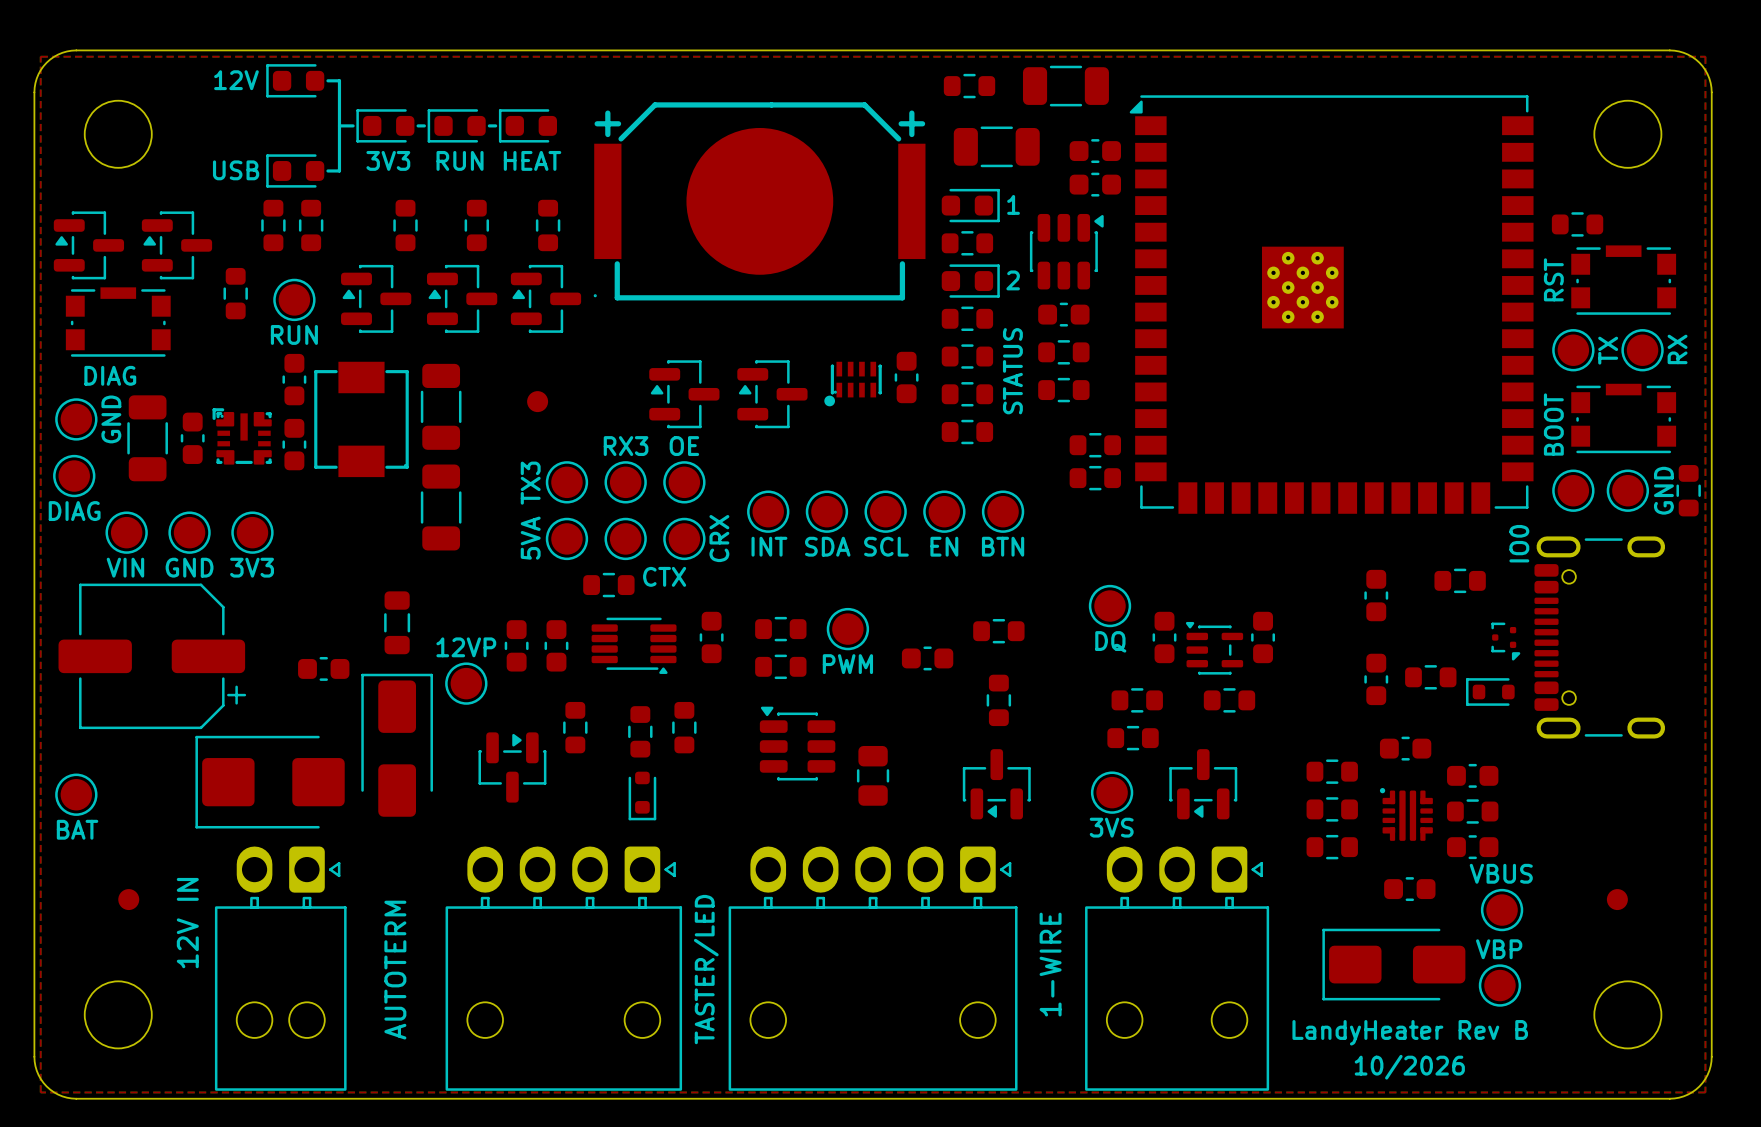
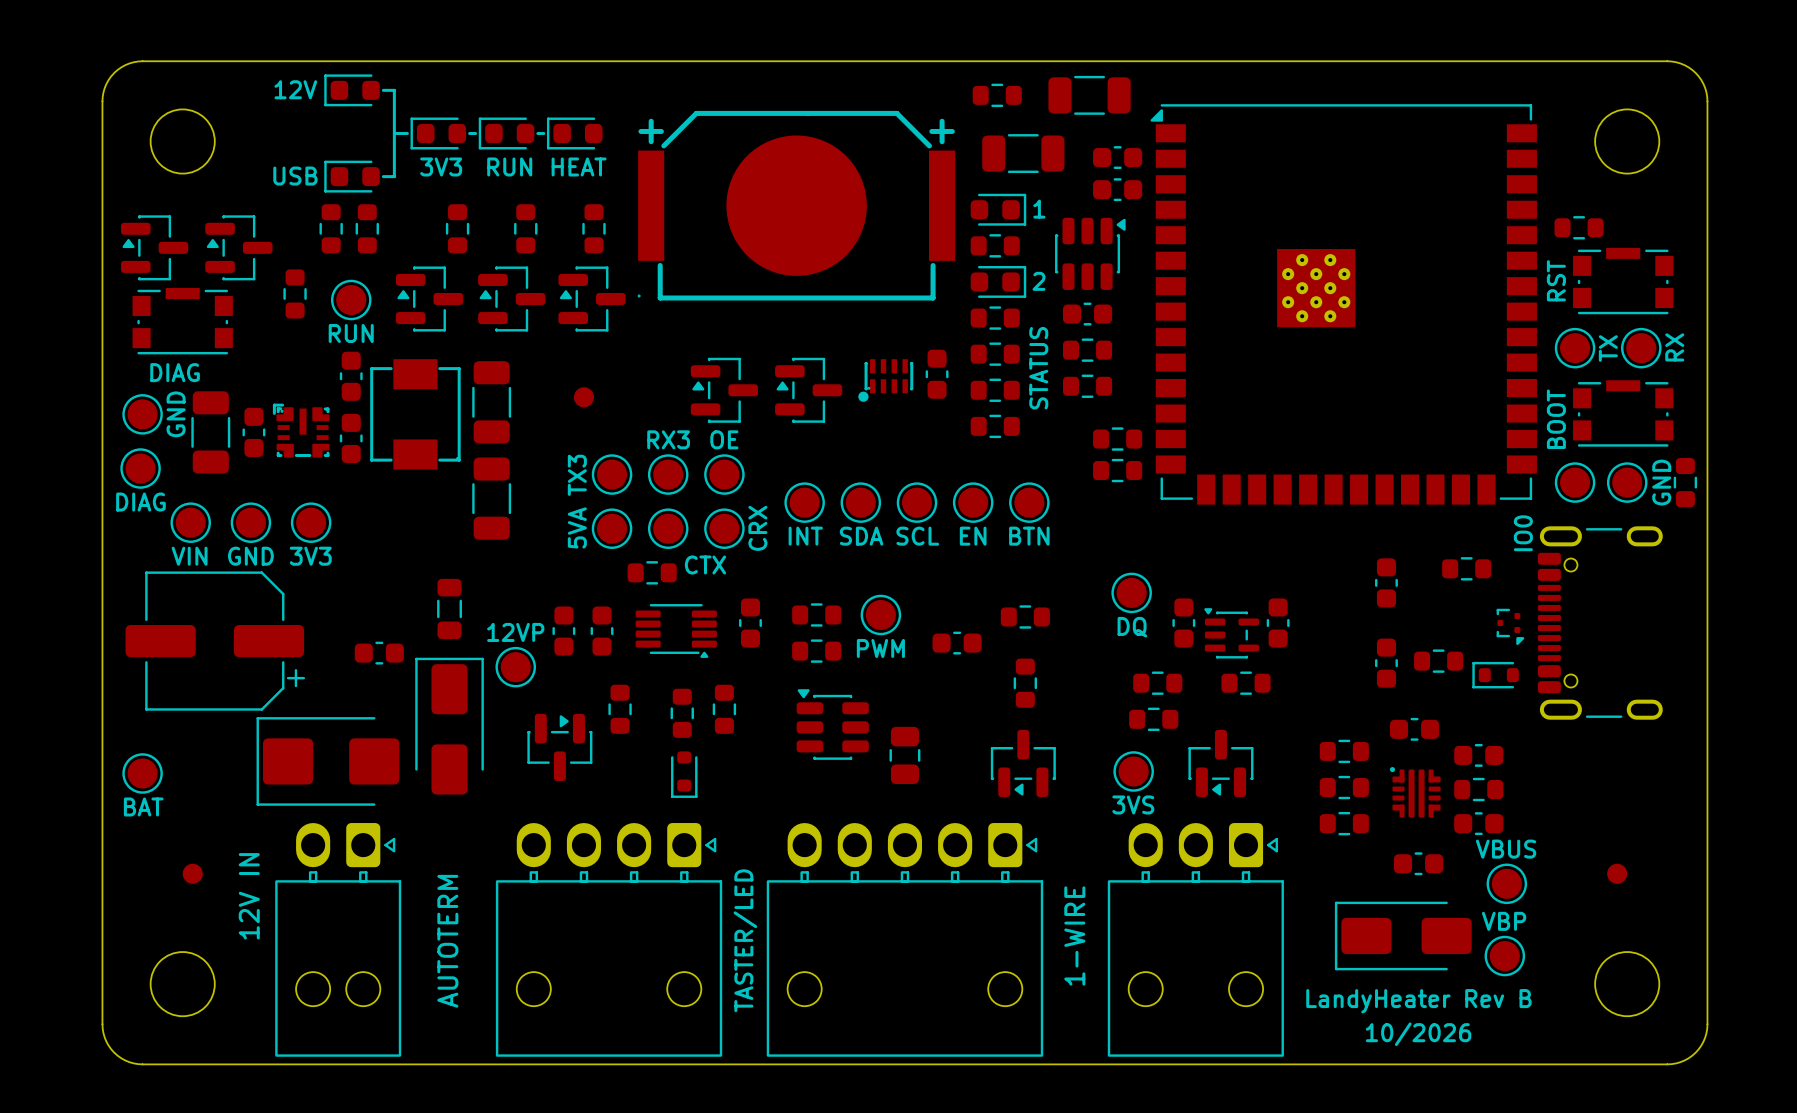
top zone outline: (40, 56) (1705, 56) (1705, 1092) (40, 1092) (40, 56) -> none

